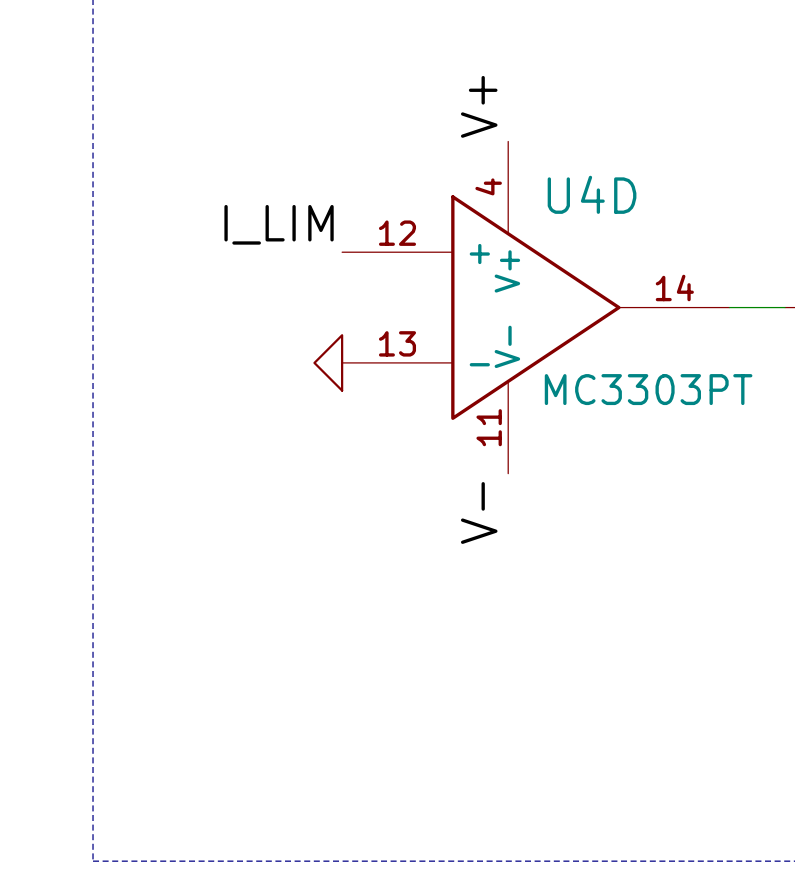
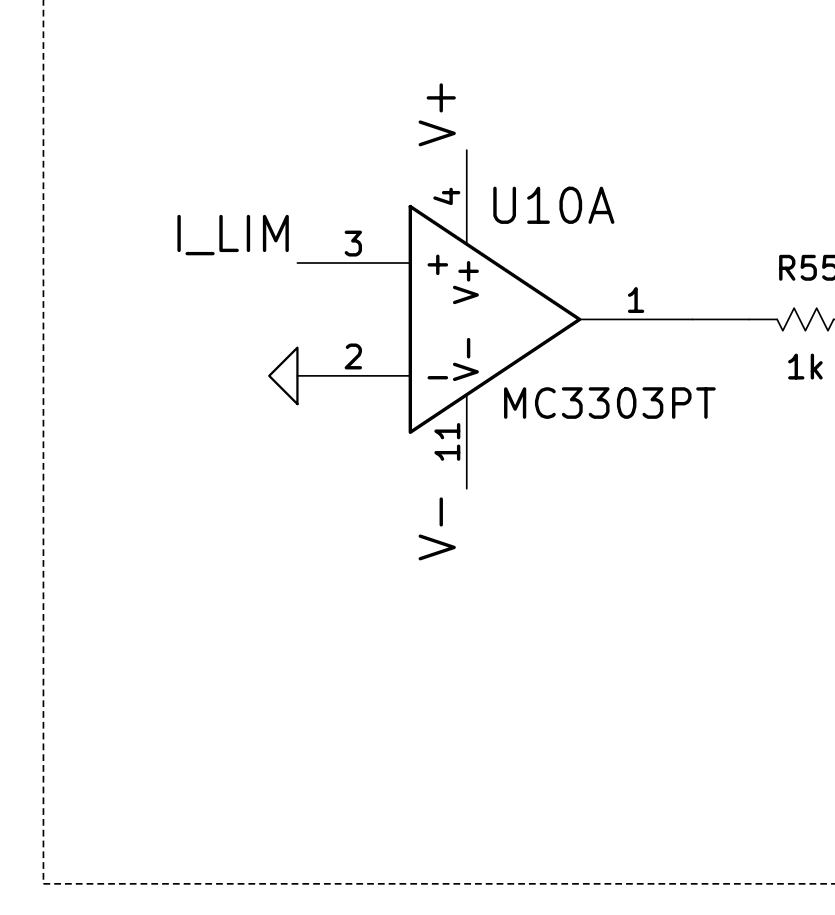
U4D name: U4D (592, 194) -> U10A (553, 205)
U4D pin number: 12 (397, 233) -> 3 (353, 243)
U4D pin number: 14 (674, 288) -> 1 (636, 300)
U4D pin number: 13 (397, 343) -> 2 (353, 356)

